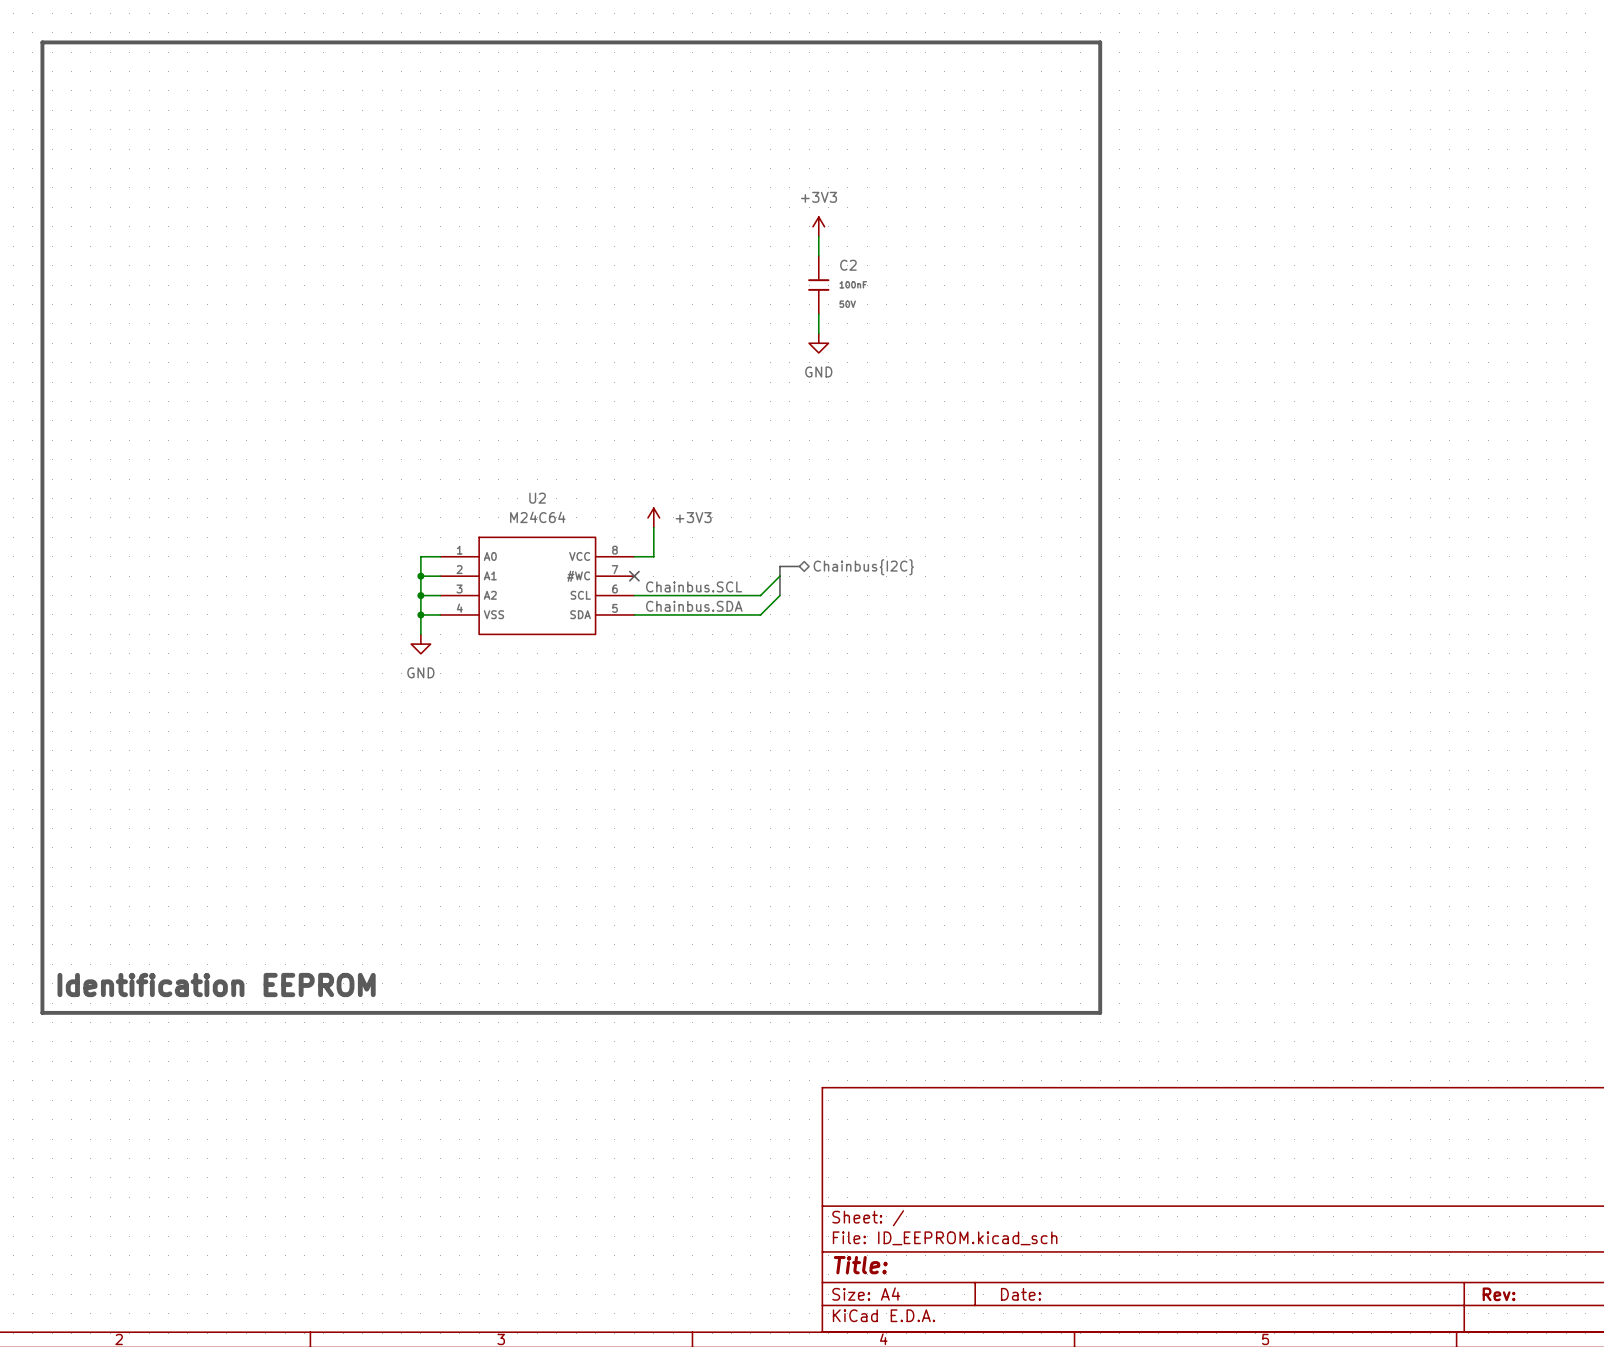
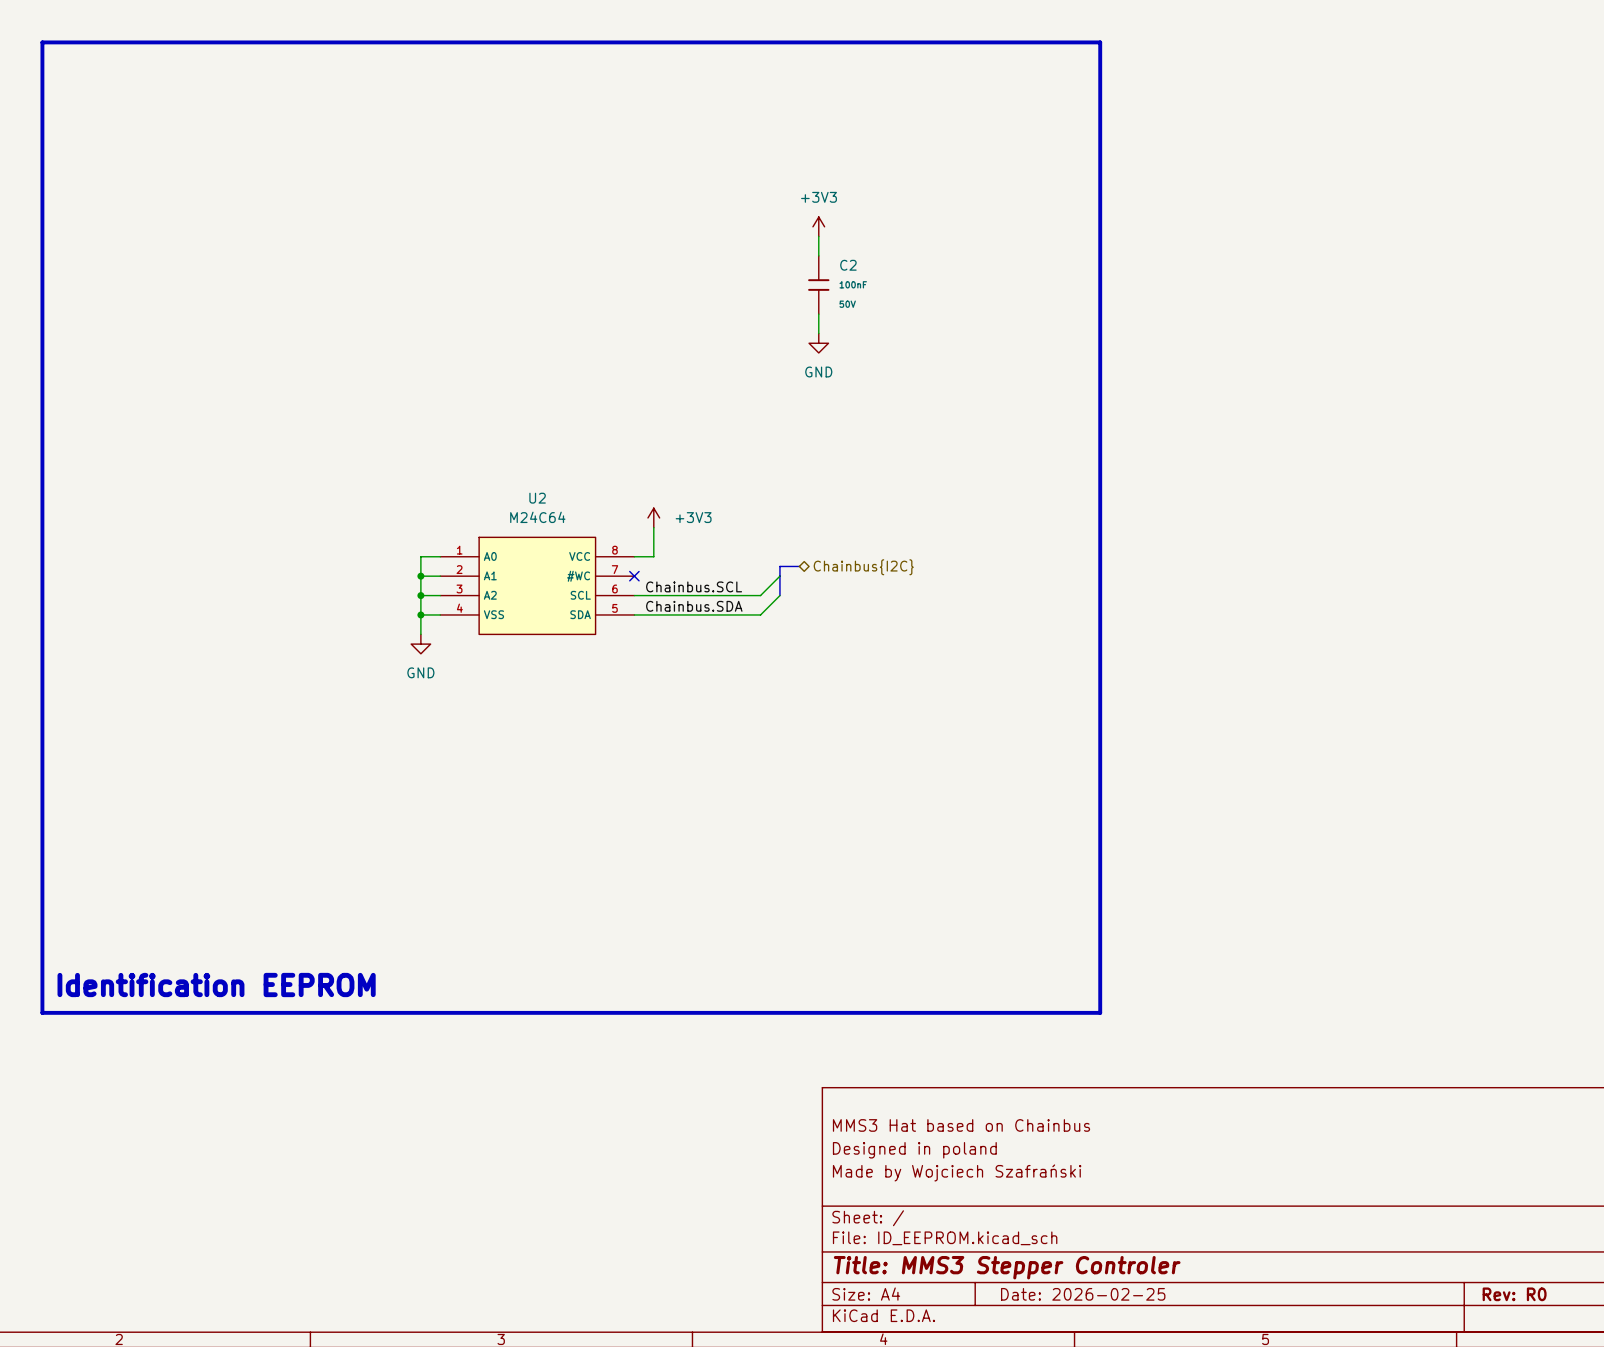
title block: none -> MMS3 Hat based on Chainbus (961, 1125)
title block: none -> Designed in poland (914, 1150)
title block: none -> Made by Wojciech Szafrański (957, 1172)
title block: Title: (860, 1265) -> Title: MMS3 Stepper Controler (1007, 1267)
title block: Date: (1020, 1294) -> Date: 2026-02-25 (1083, 1294)
title block: Rev: (1499, 1294) -> Rev: R0 (1514, 1294)

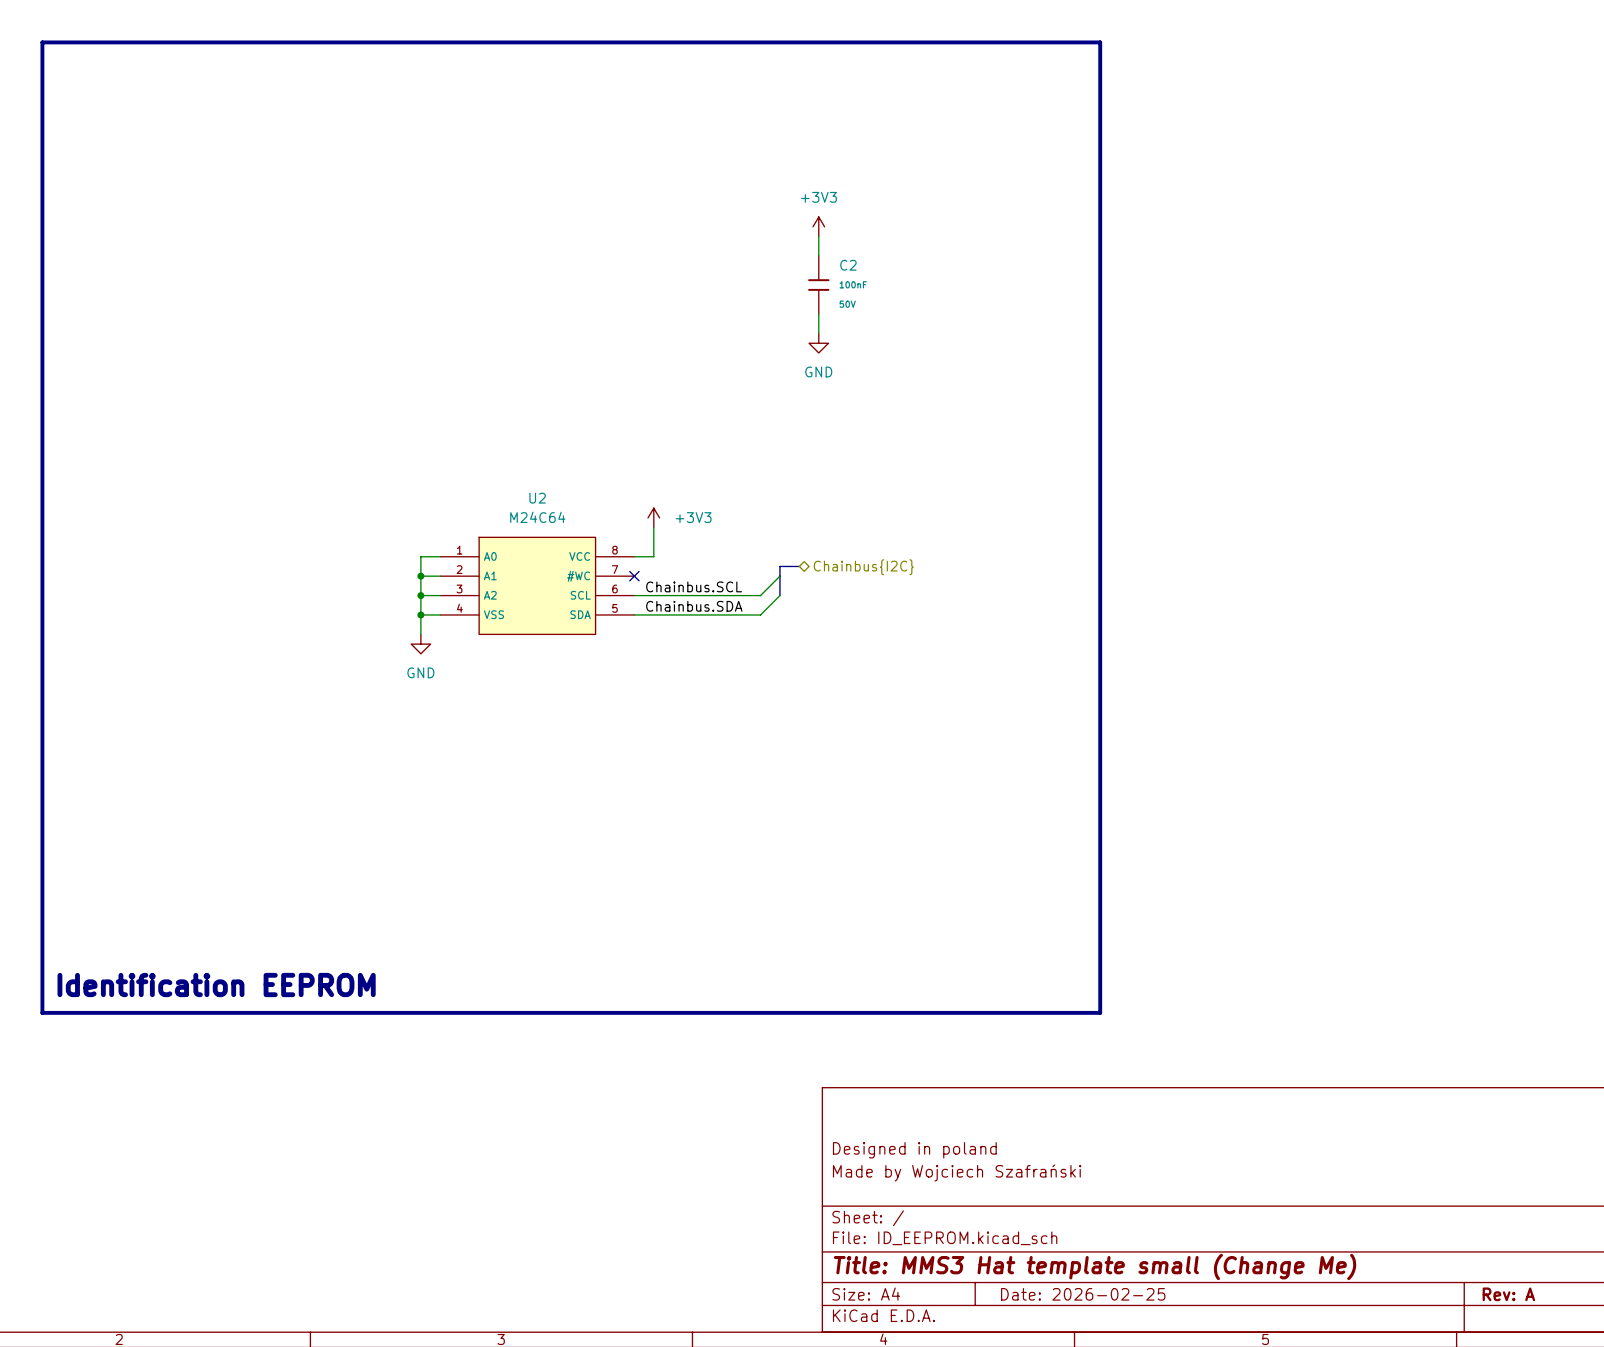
title block: MMS3 Hat based on Chainbus (961, 1125) -> none
title block: Title: MMS3 Stepper Controler (1007, 1267) -> Title: MMS3 Hat template small (Change Me) (1095, 1266)
title block: Rev: R0 (1514, 1294) -> Rev: A (1508, 1294)

